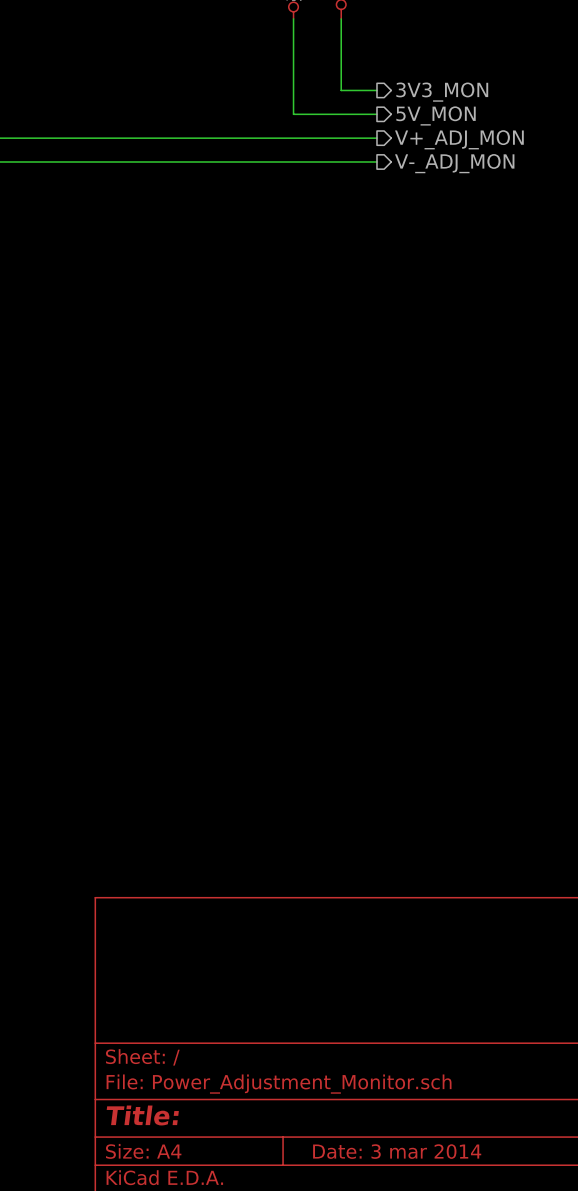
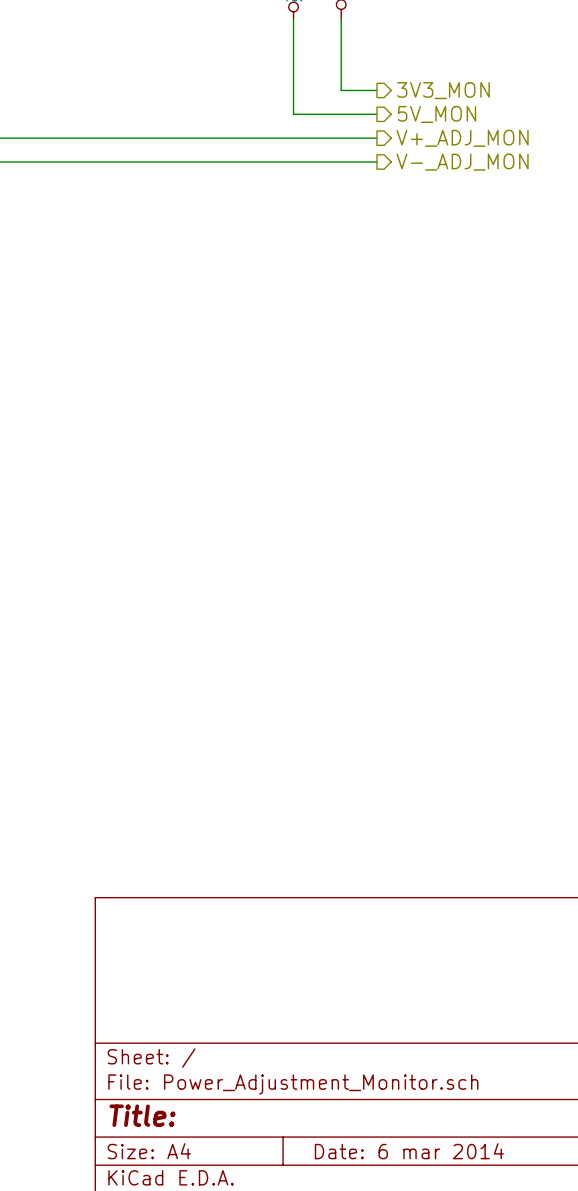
title block: Date: 3 mar 2014 (397, 1151) -> Date: 6 mar 2014 (409, 1151)

